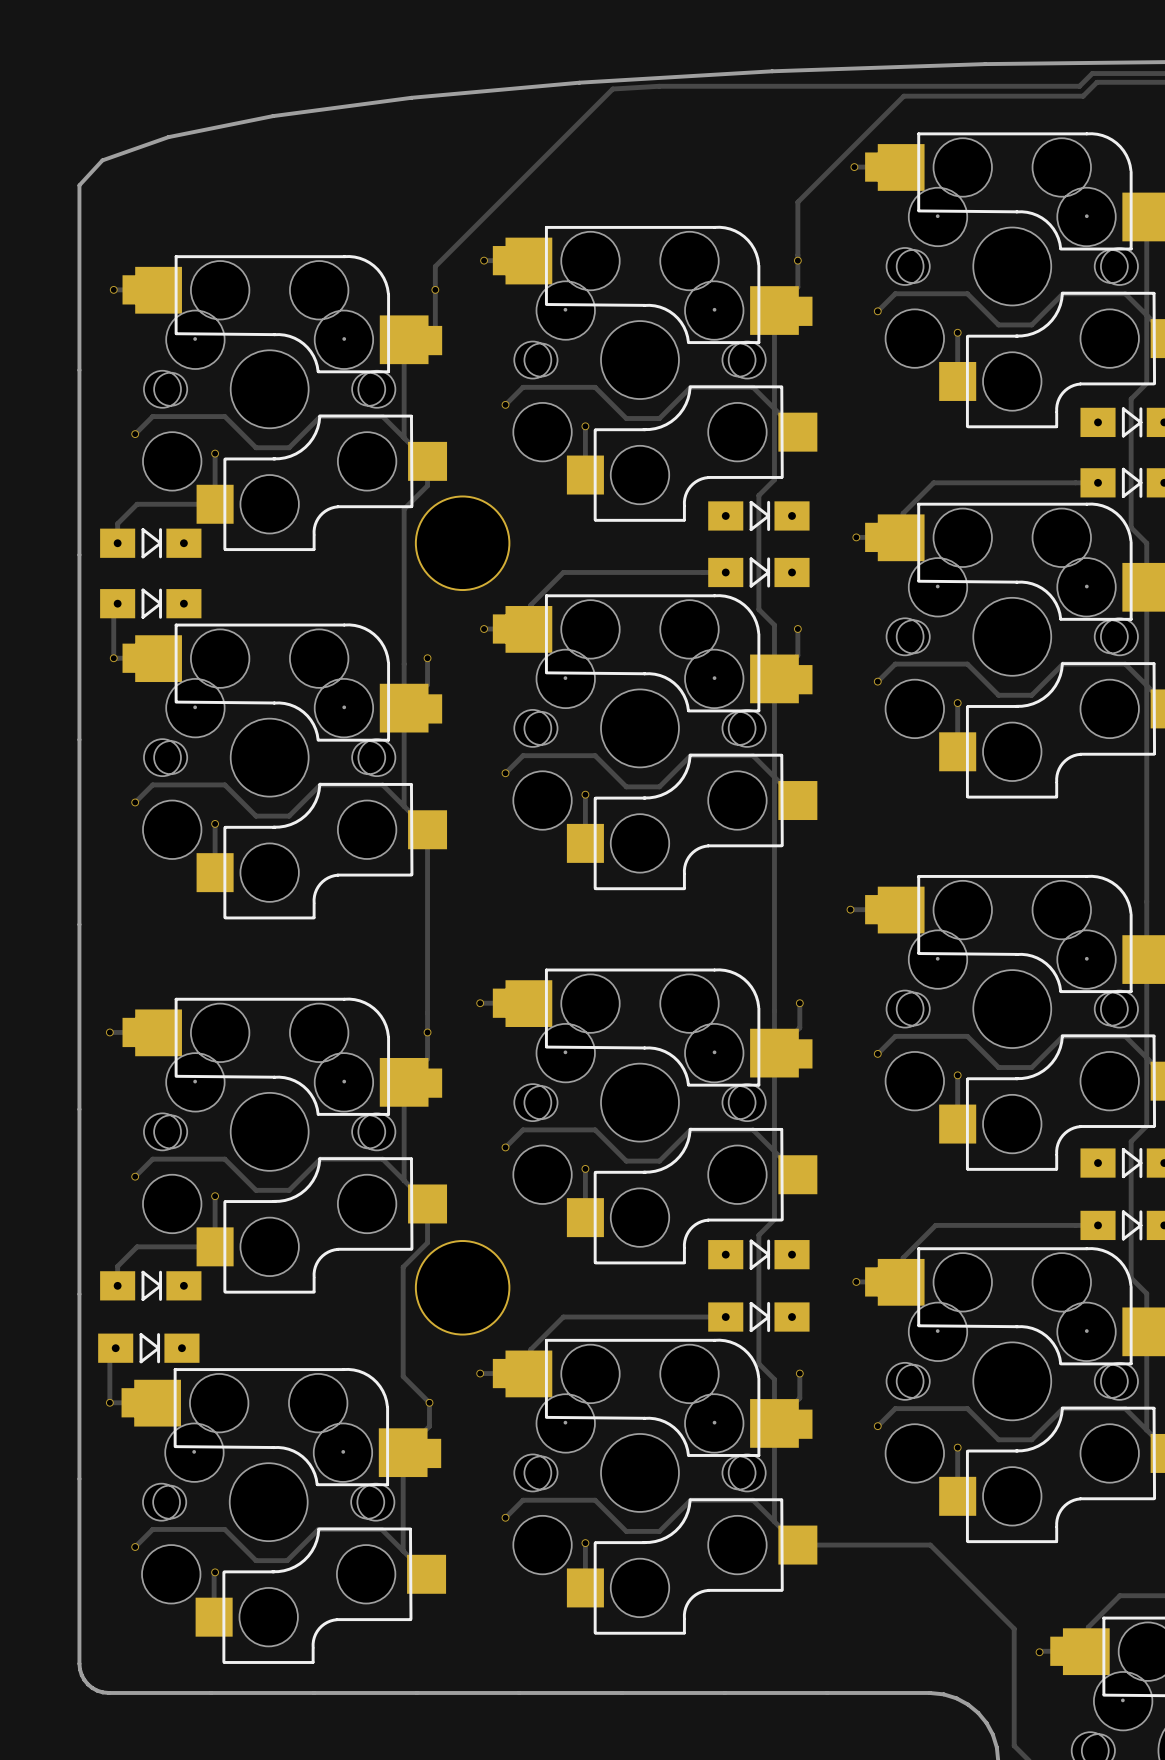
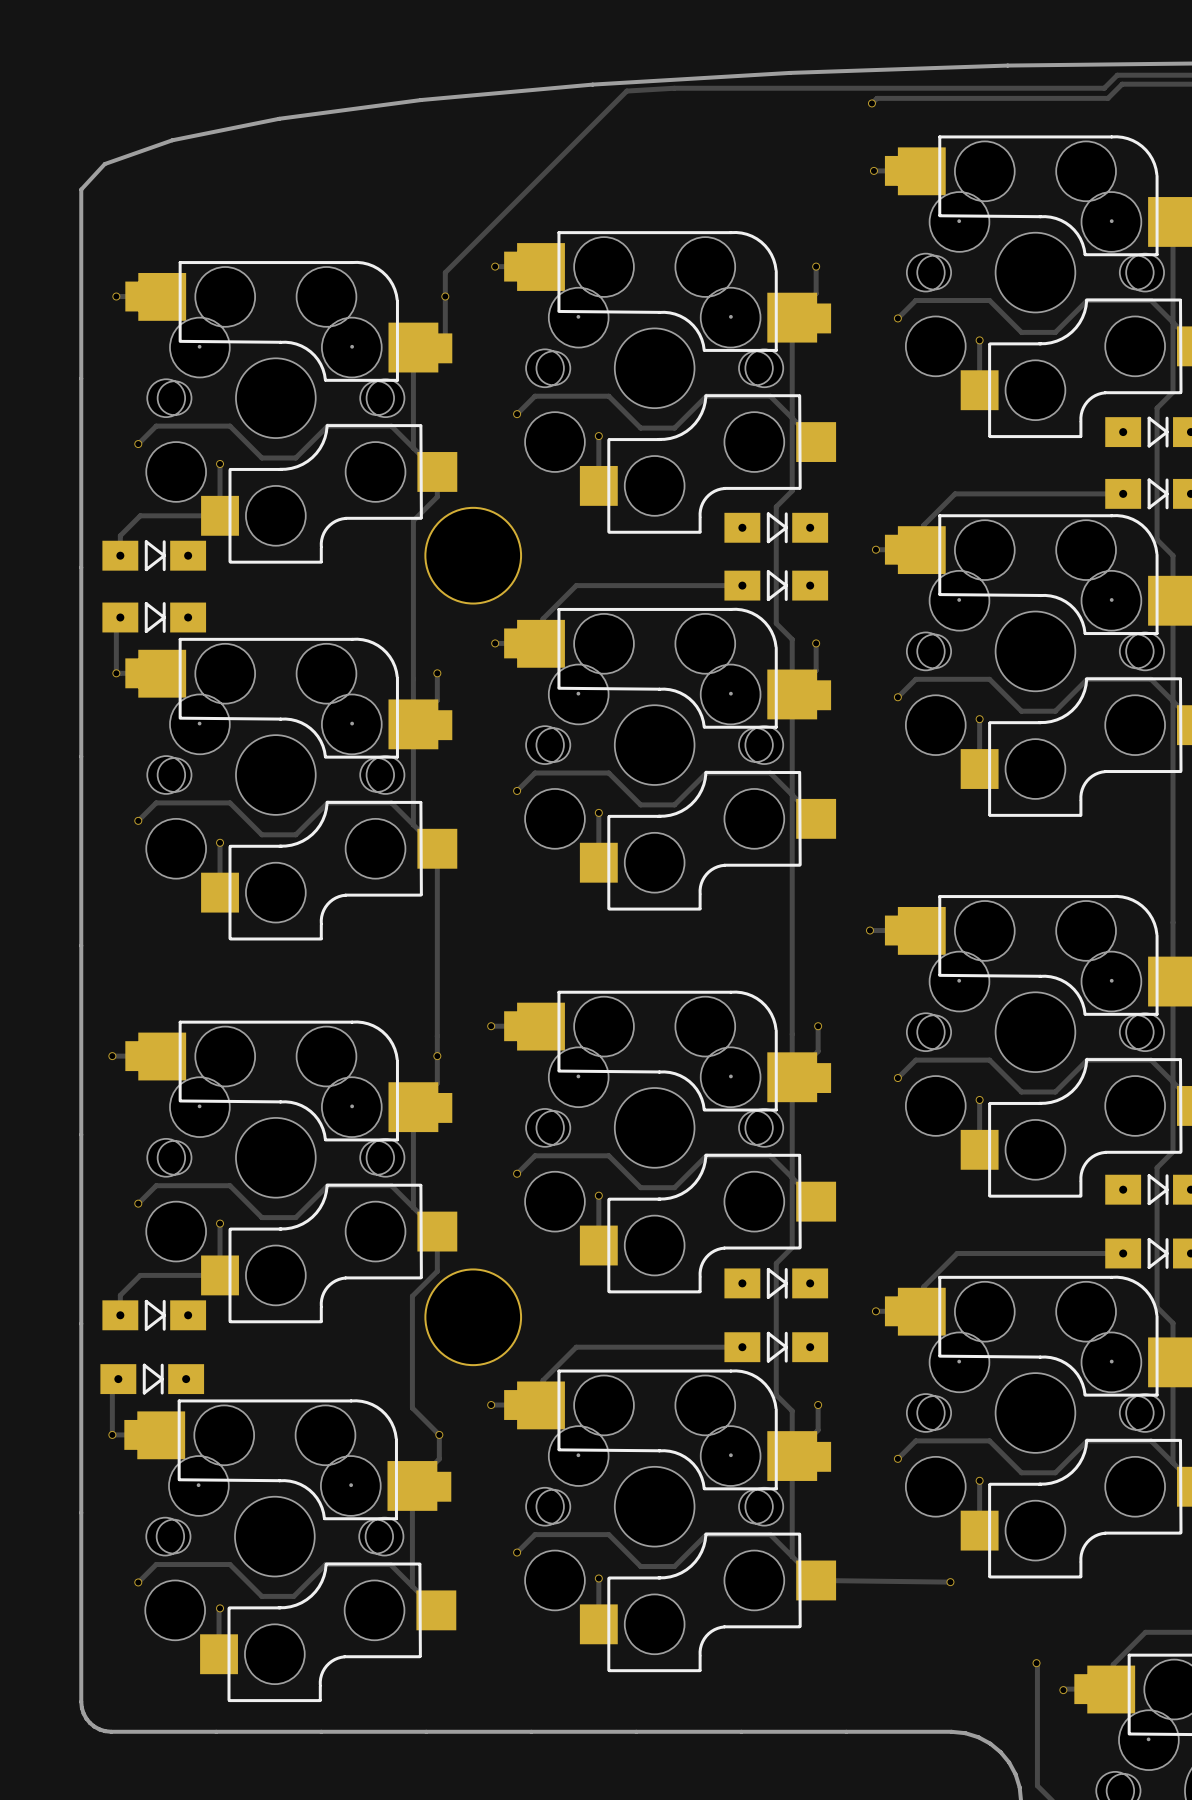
track: (903, 96) (797, 202) (797, 260) -> (924, 98) (877, 98) (871, 103)
via: none -> (871, 103)
track: (797, 1545) (930, 1545) (1013, 1627) -> (816, 1580) (950, 1582)
via: none -> (950, 1582)
via: none -> (1036, 1663)

